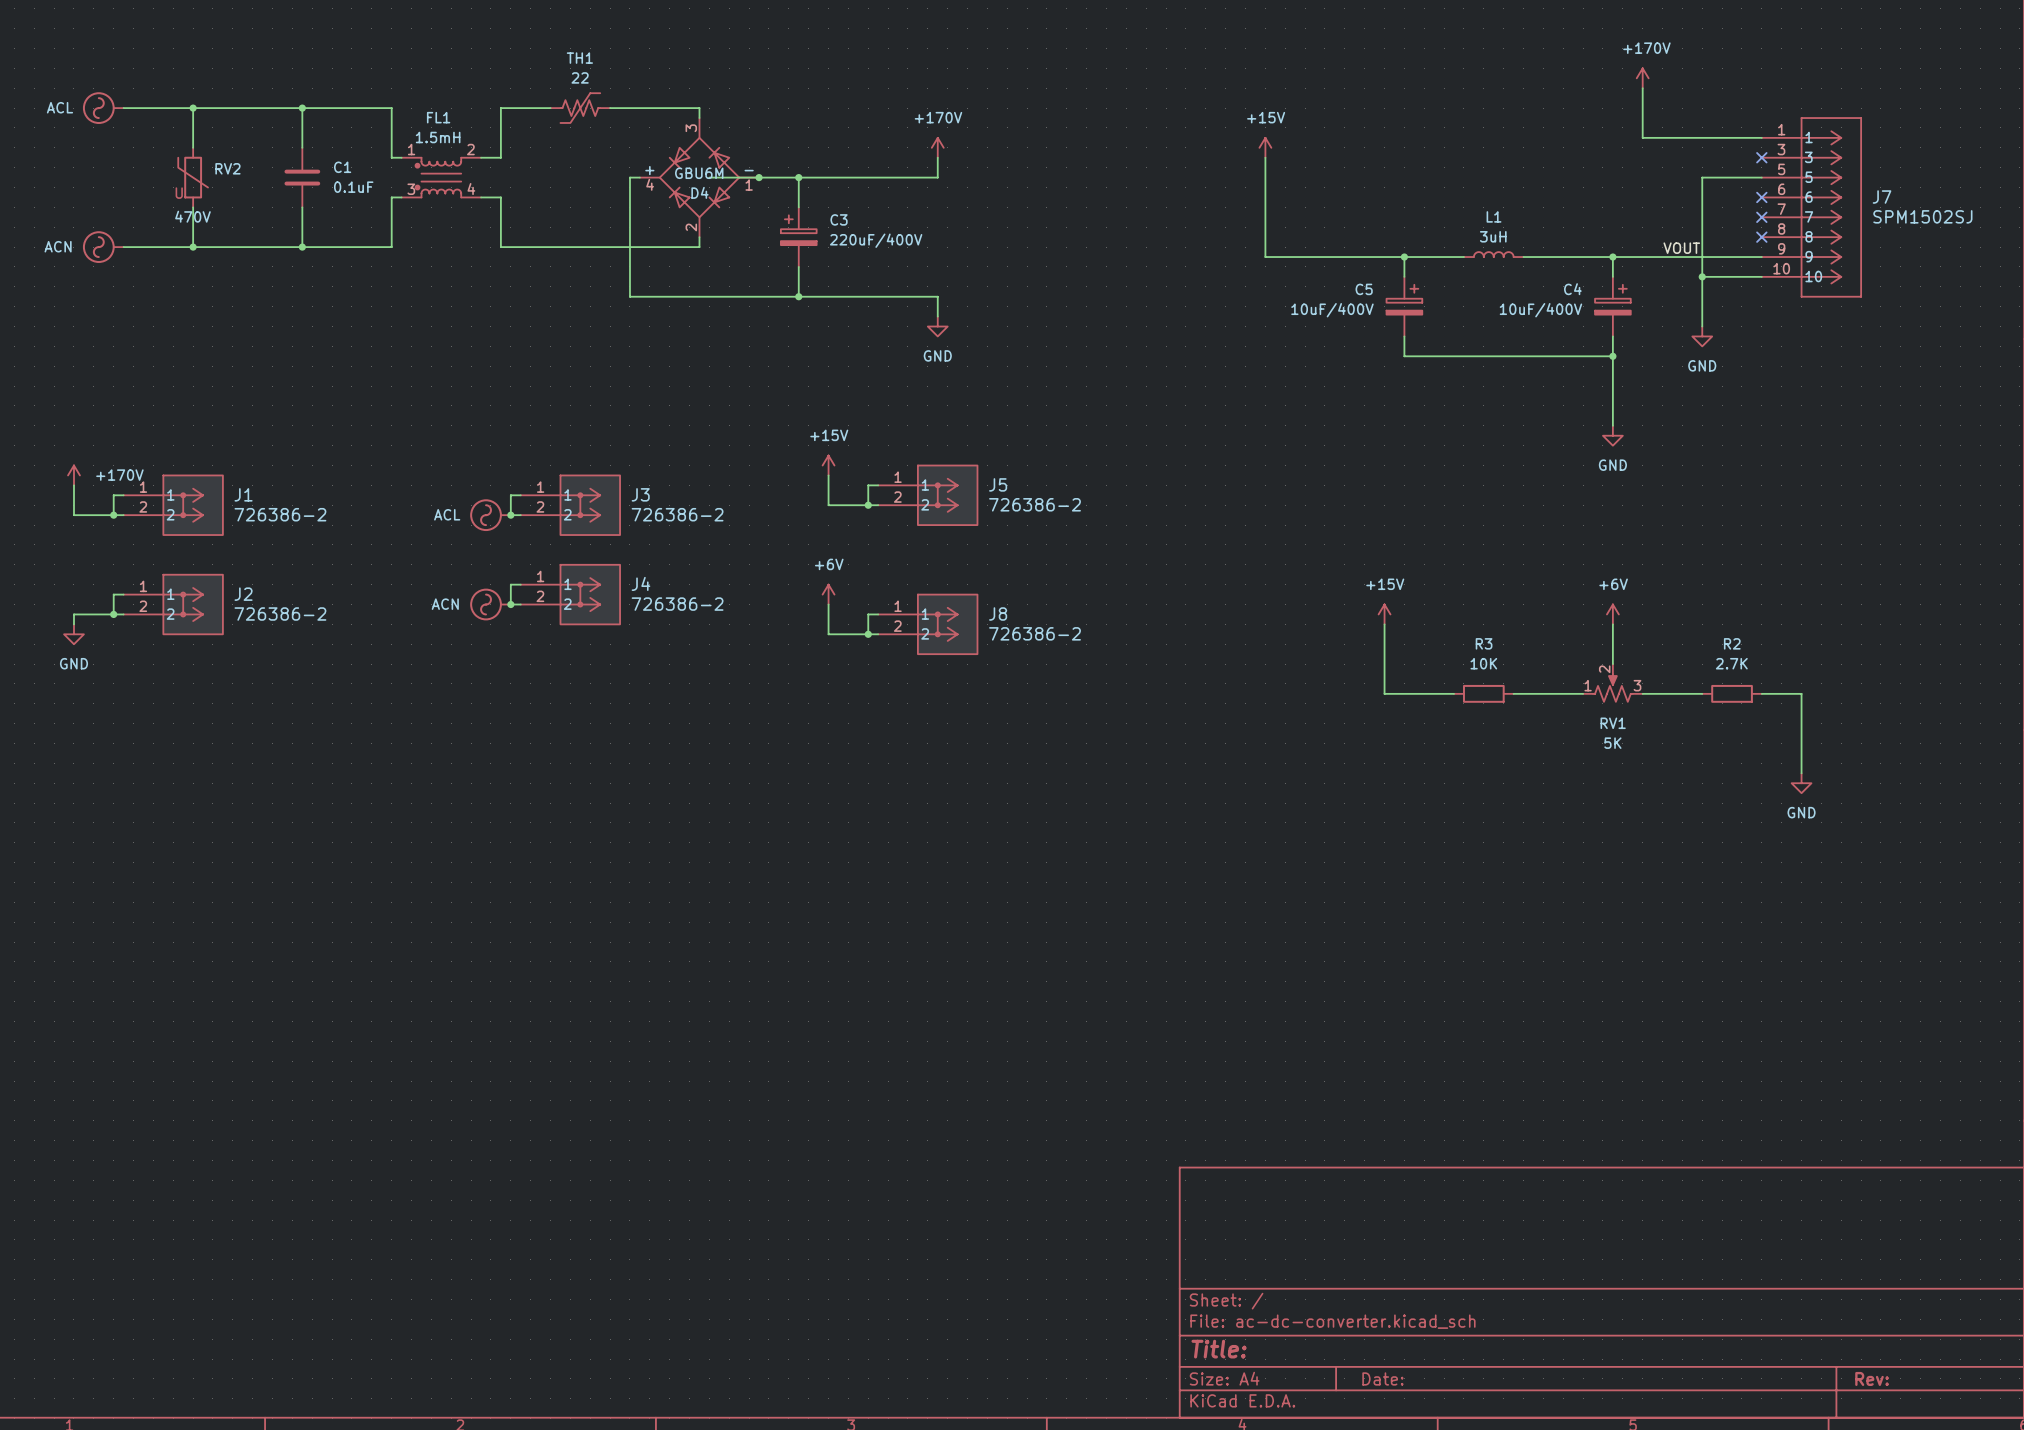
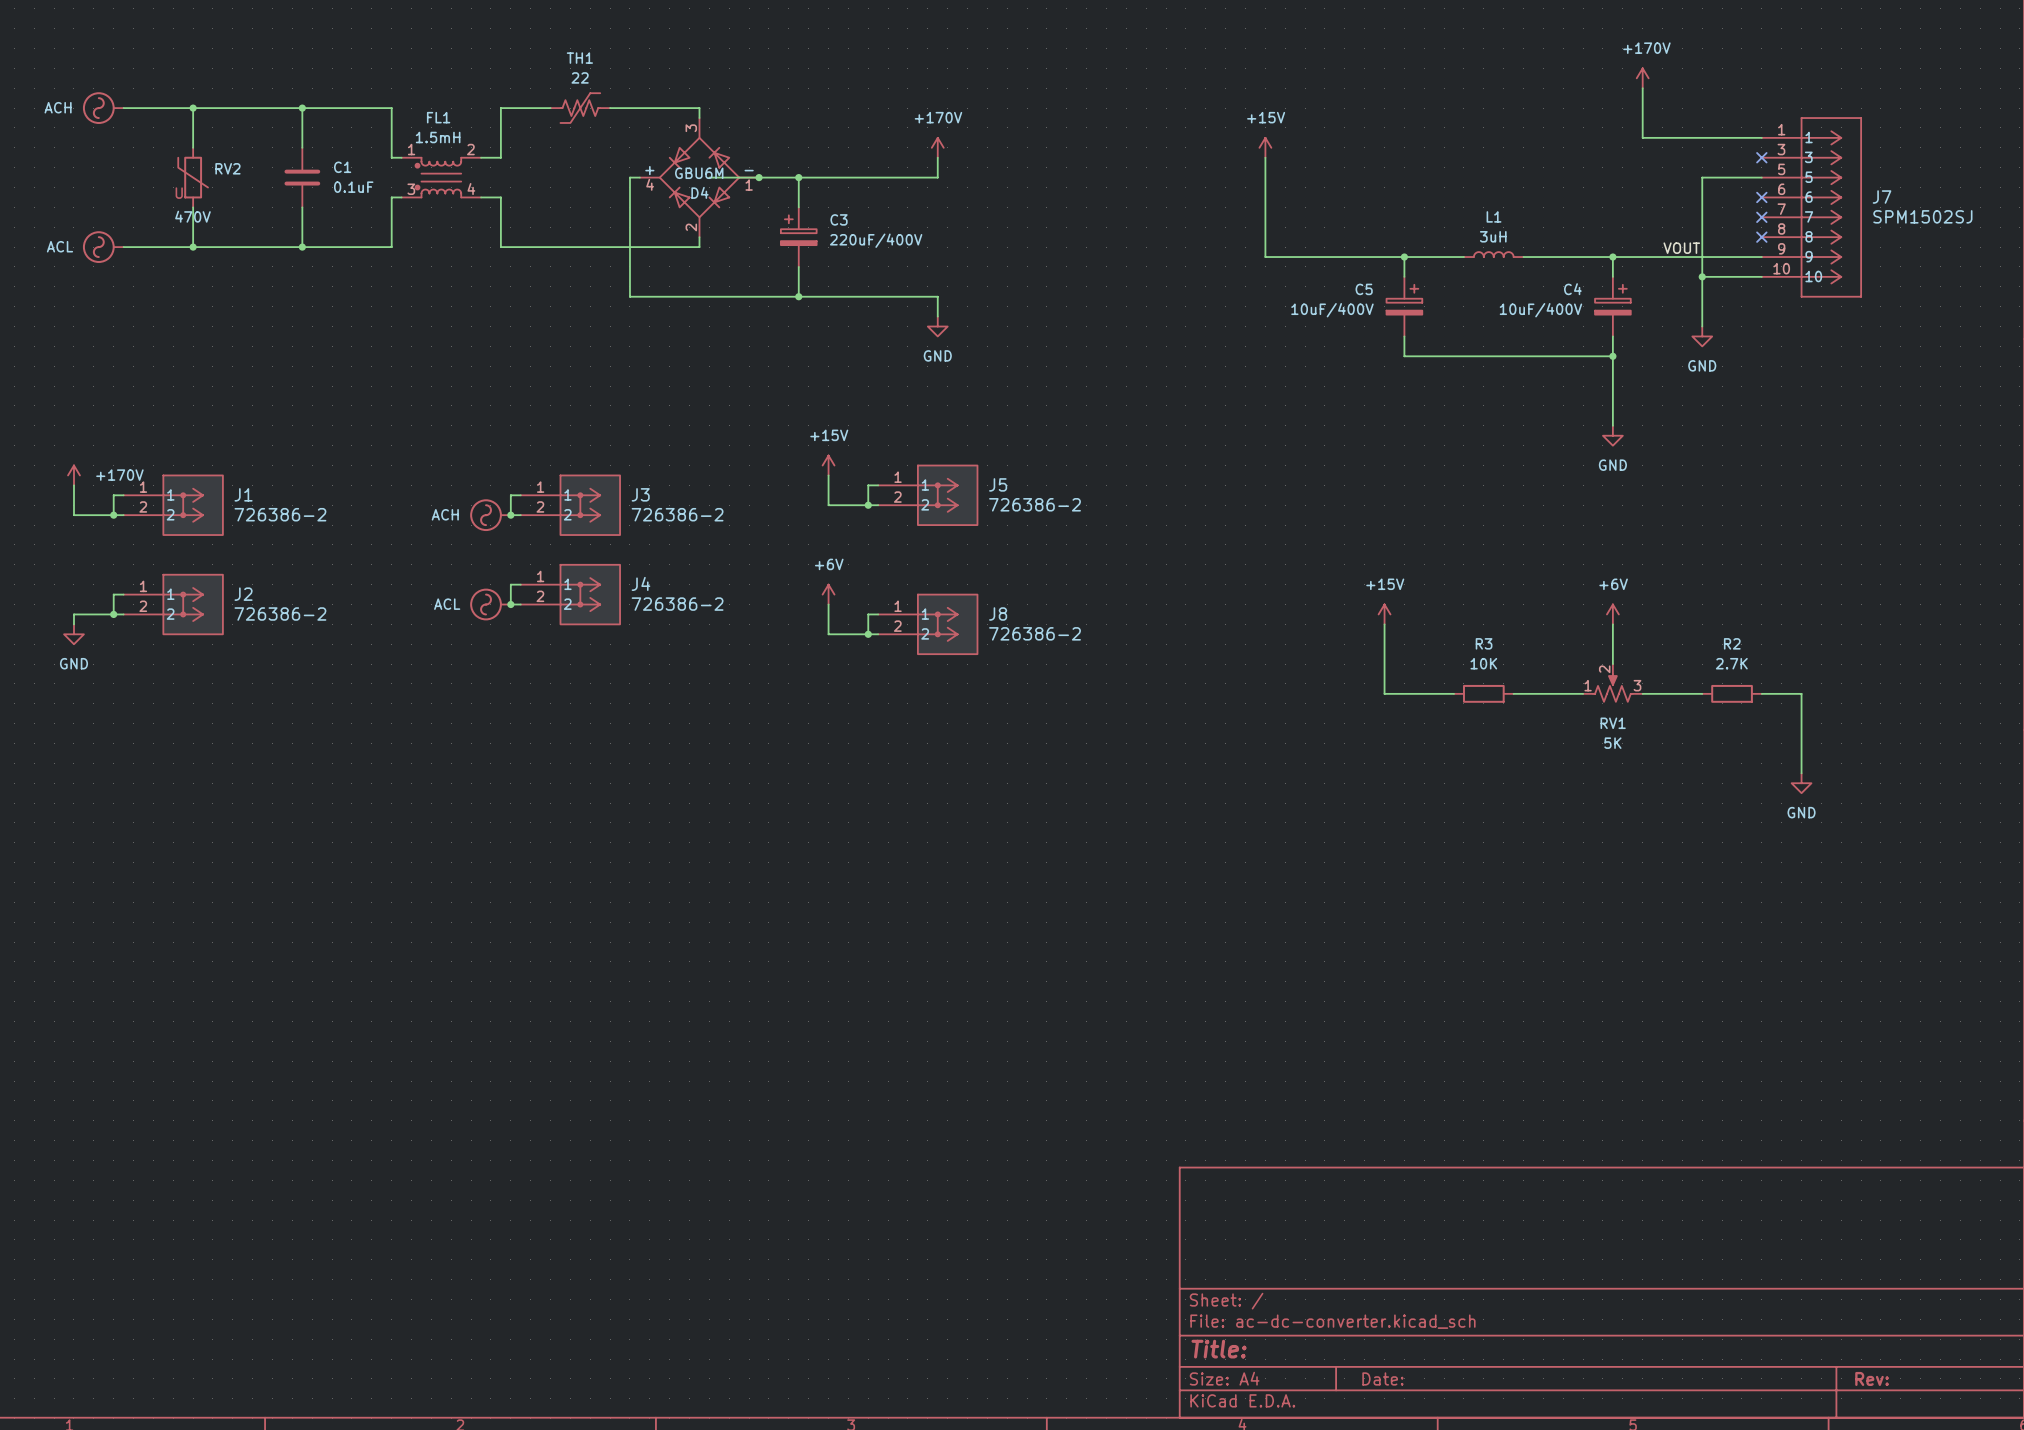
power symbol: ACL (103, 108) -> ACH (103, 108)
power symbol: ACN (103, 247) -> ACL (103, 247)
power symbol: ACL (490, 515) -> ACH (490, 515)
power symbol: ACN (490, 604) -> ACL (490, 604)

